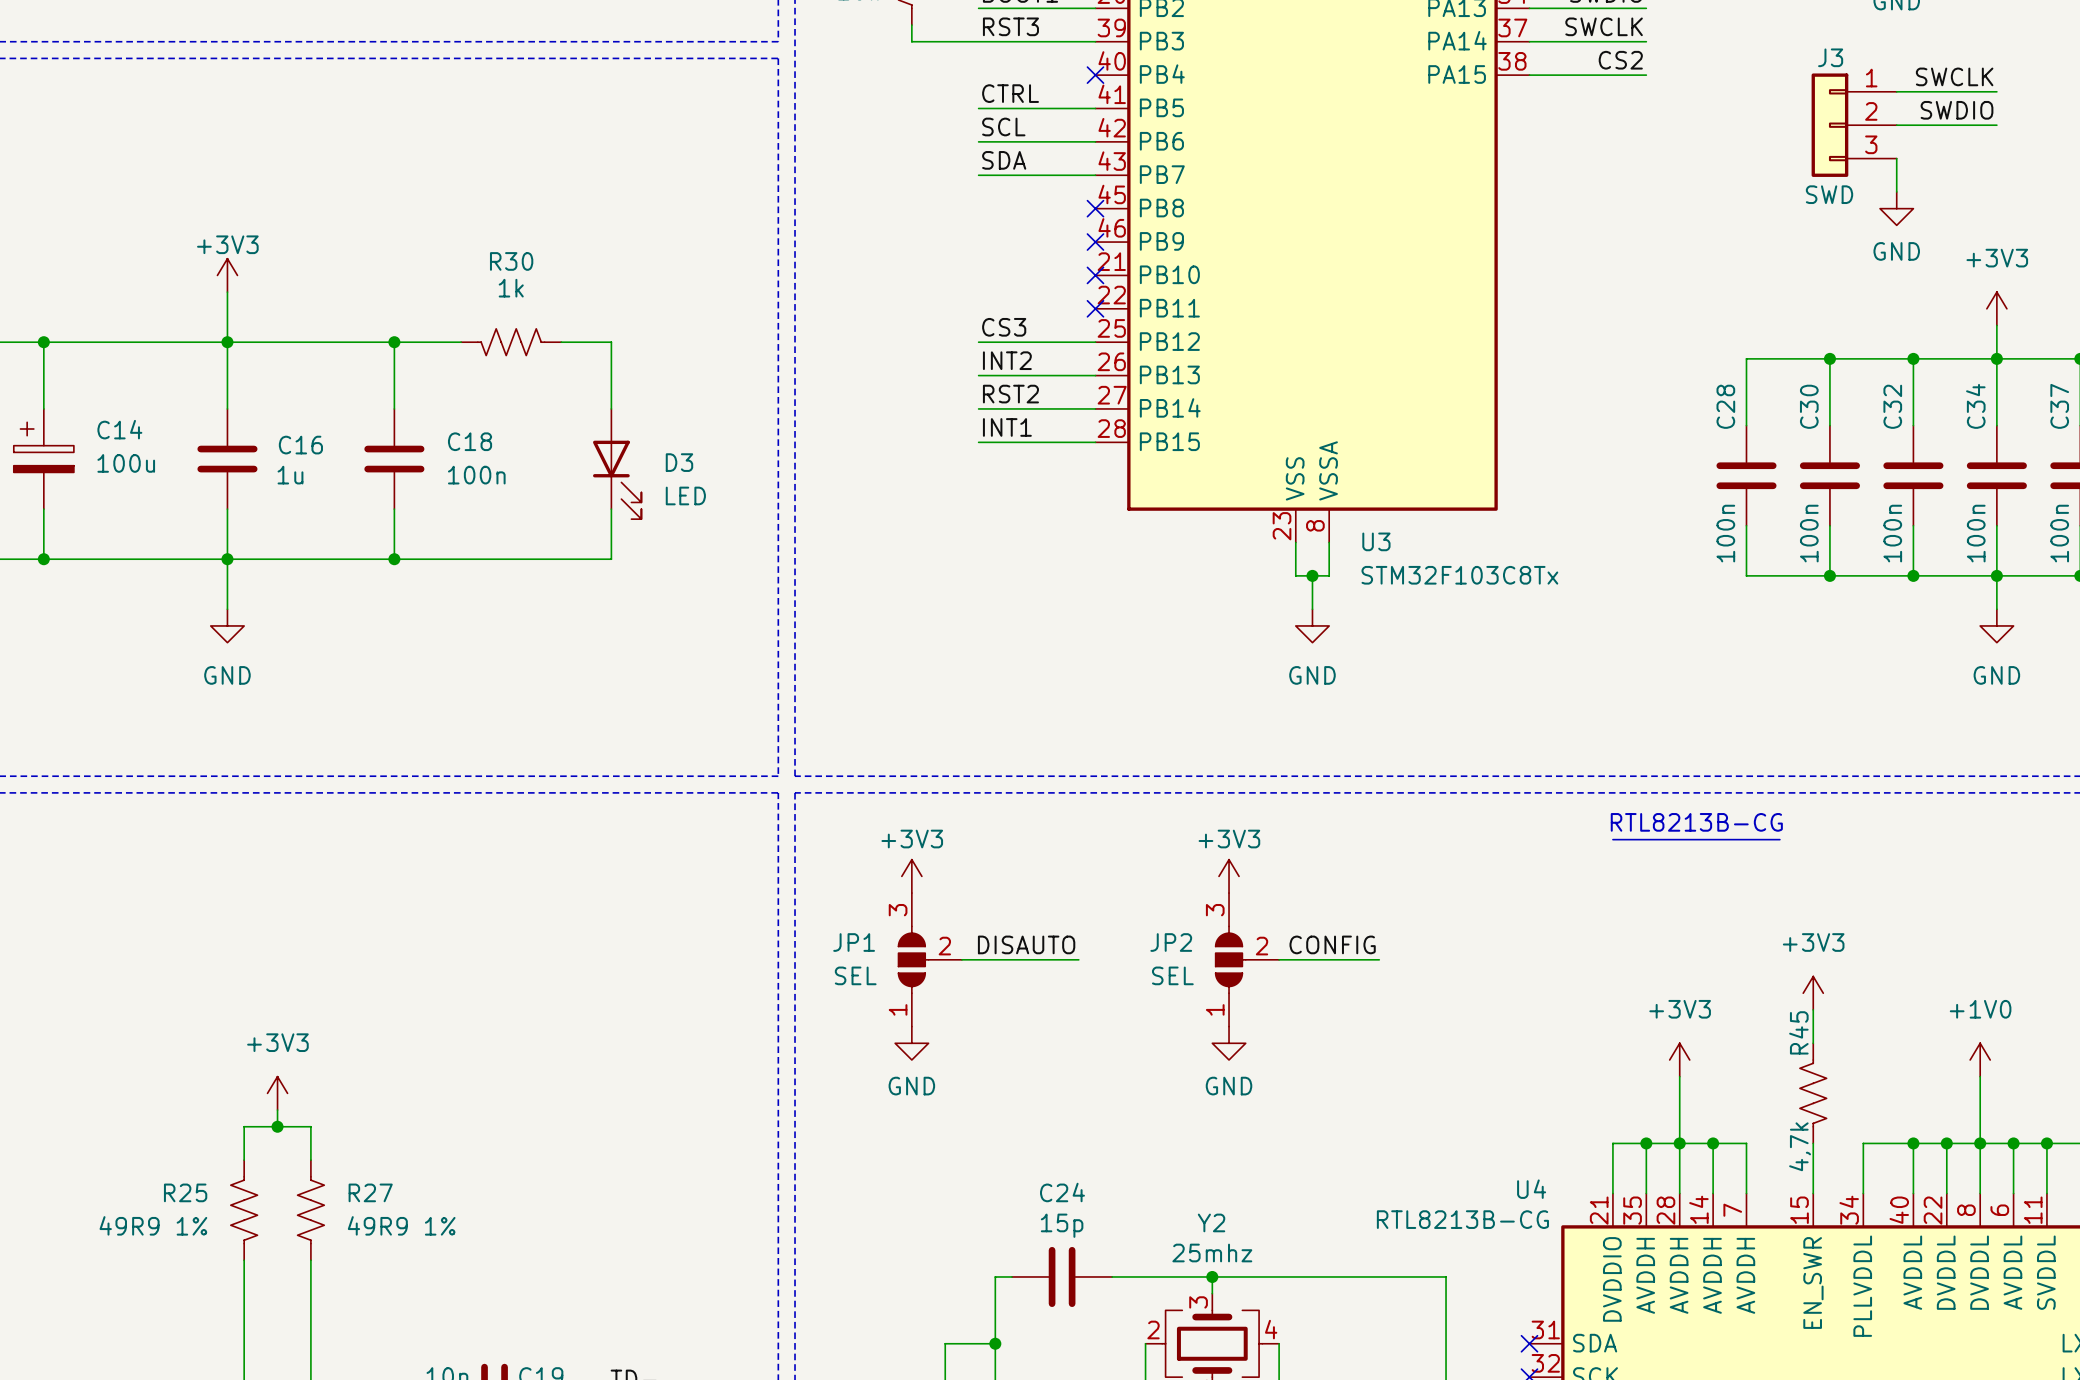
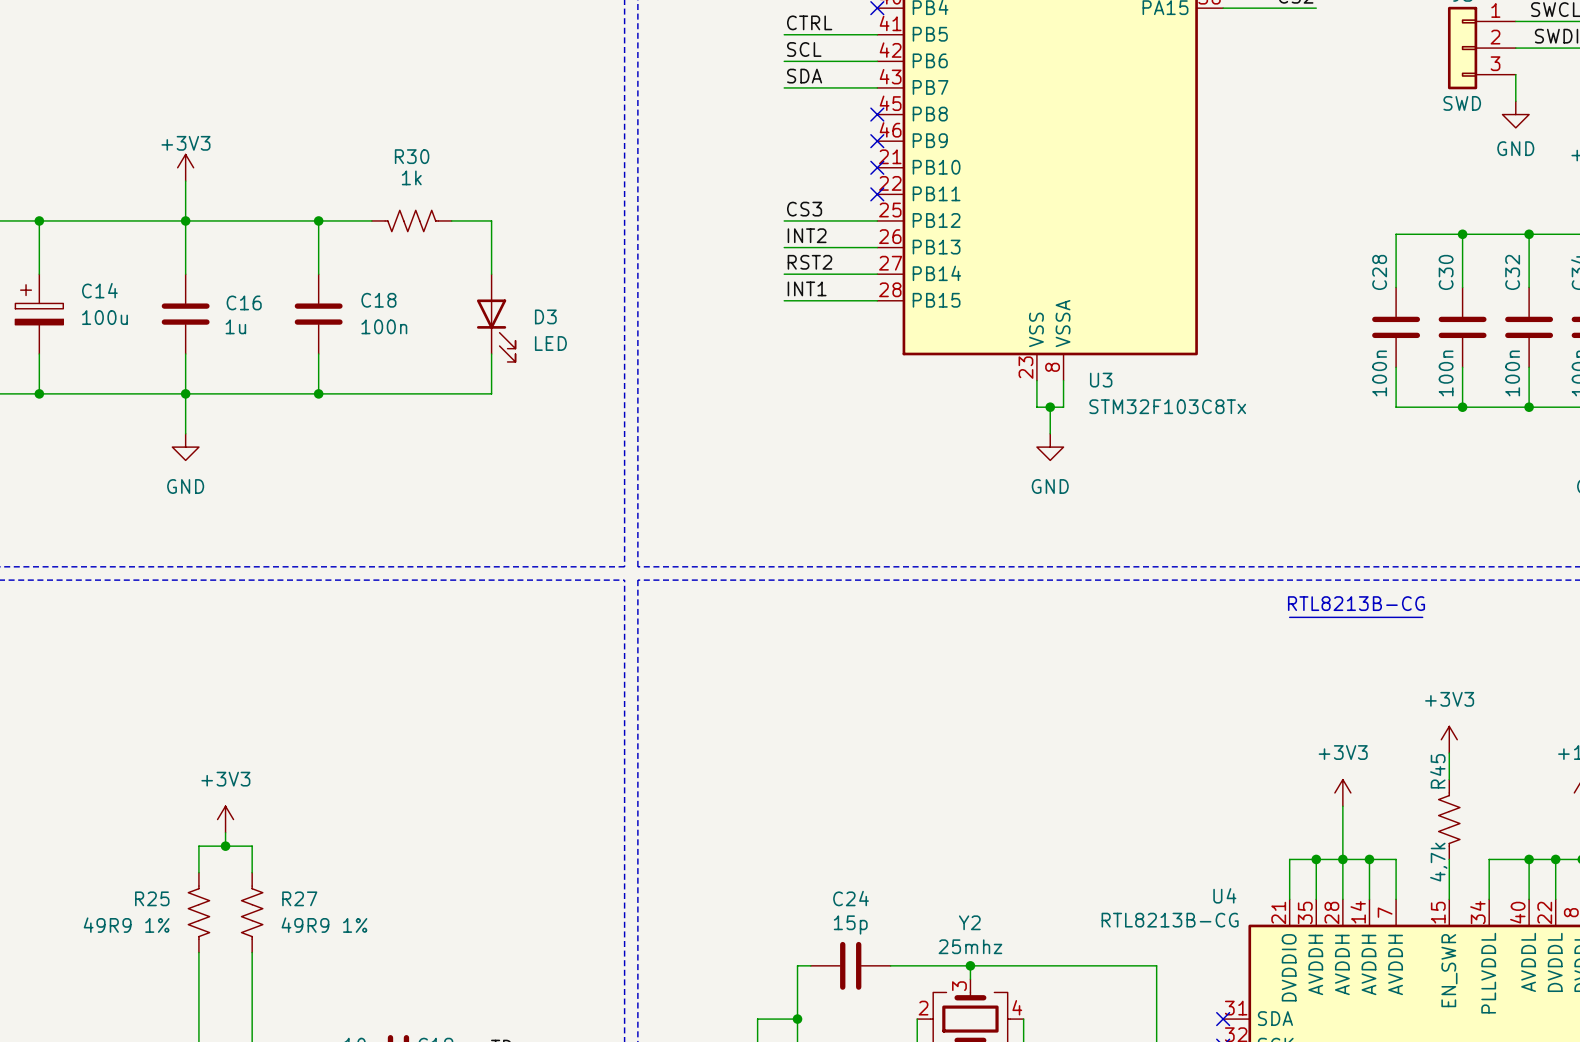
power symbol: +3V3 (911, 876) -> none
power symbol: +3V3 (1229, 876) -> none
label: DISAUTO (1026, 944) -> none
label: CONFIG (1332, 944) -> none
JP1: SEL (930, 959) -> none
wire: (961, 959) (1078, 959) -> none
JP2: SEL (1247, 959) -> none
wire: (1279, 959) (1379, 959) -> none
power symbol: GND (911, 1043) -> none
power symbol: GND (1229, 1043) -> none

